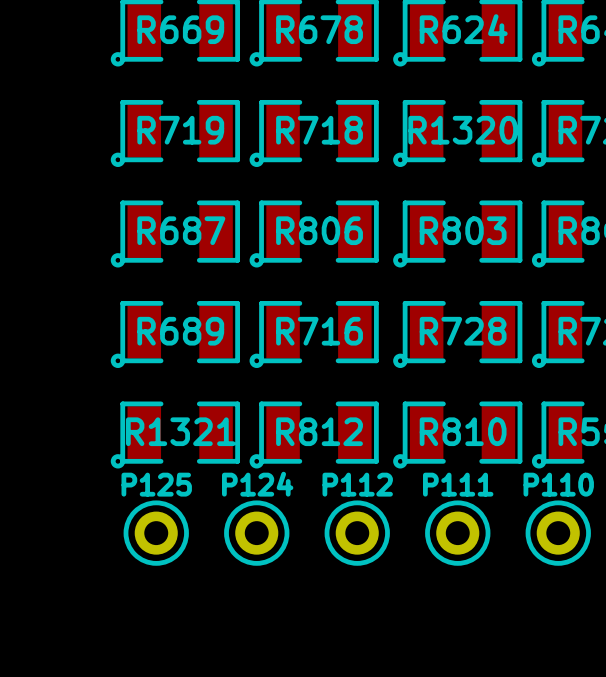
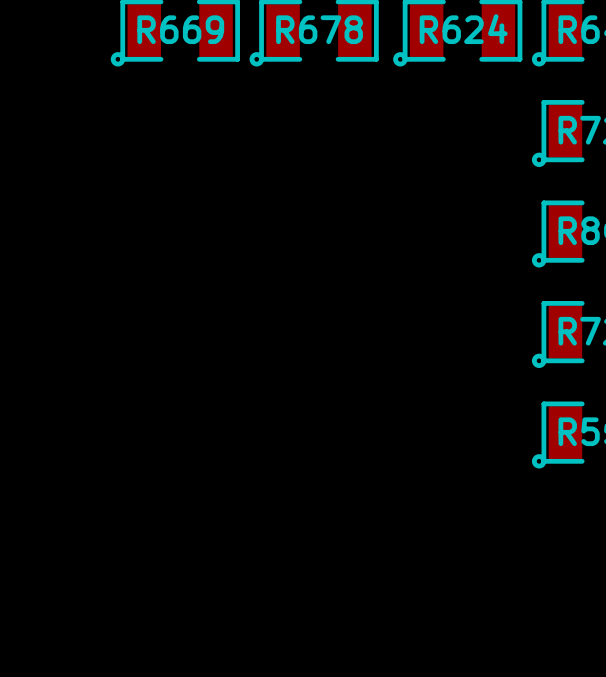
R719: (175, 133) -> none
R718: (314, 133) -> none
R1320: (457, 133) -> none
R687: (175, 233) -> none
R806: (314, 233) -> none
R803: (457, 233) -> none
R689: (175, 334) -> none
R716: (314, 334) -> none
R728: (457, 334) -> none
R1321: (175, 435) -> none
R812: (314, 435) -> none
R810: (457, 435) -> none
P125: (156, 533) -> none
P124: (256, 533) -> none
P112: (357, 533) -> none
P111: (457, 533) -> none
P110: (558, 533) -> none

